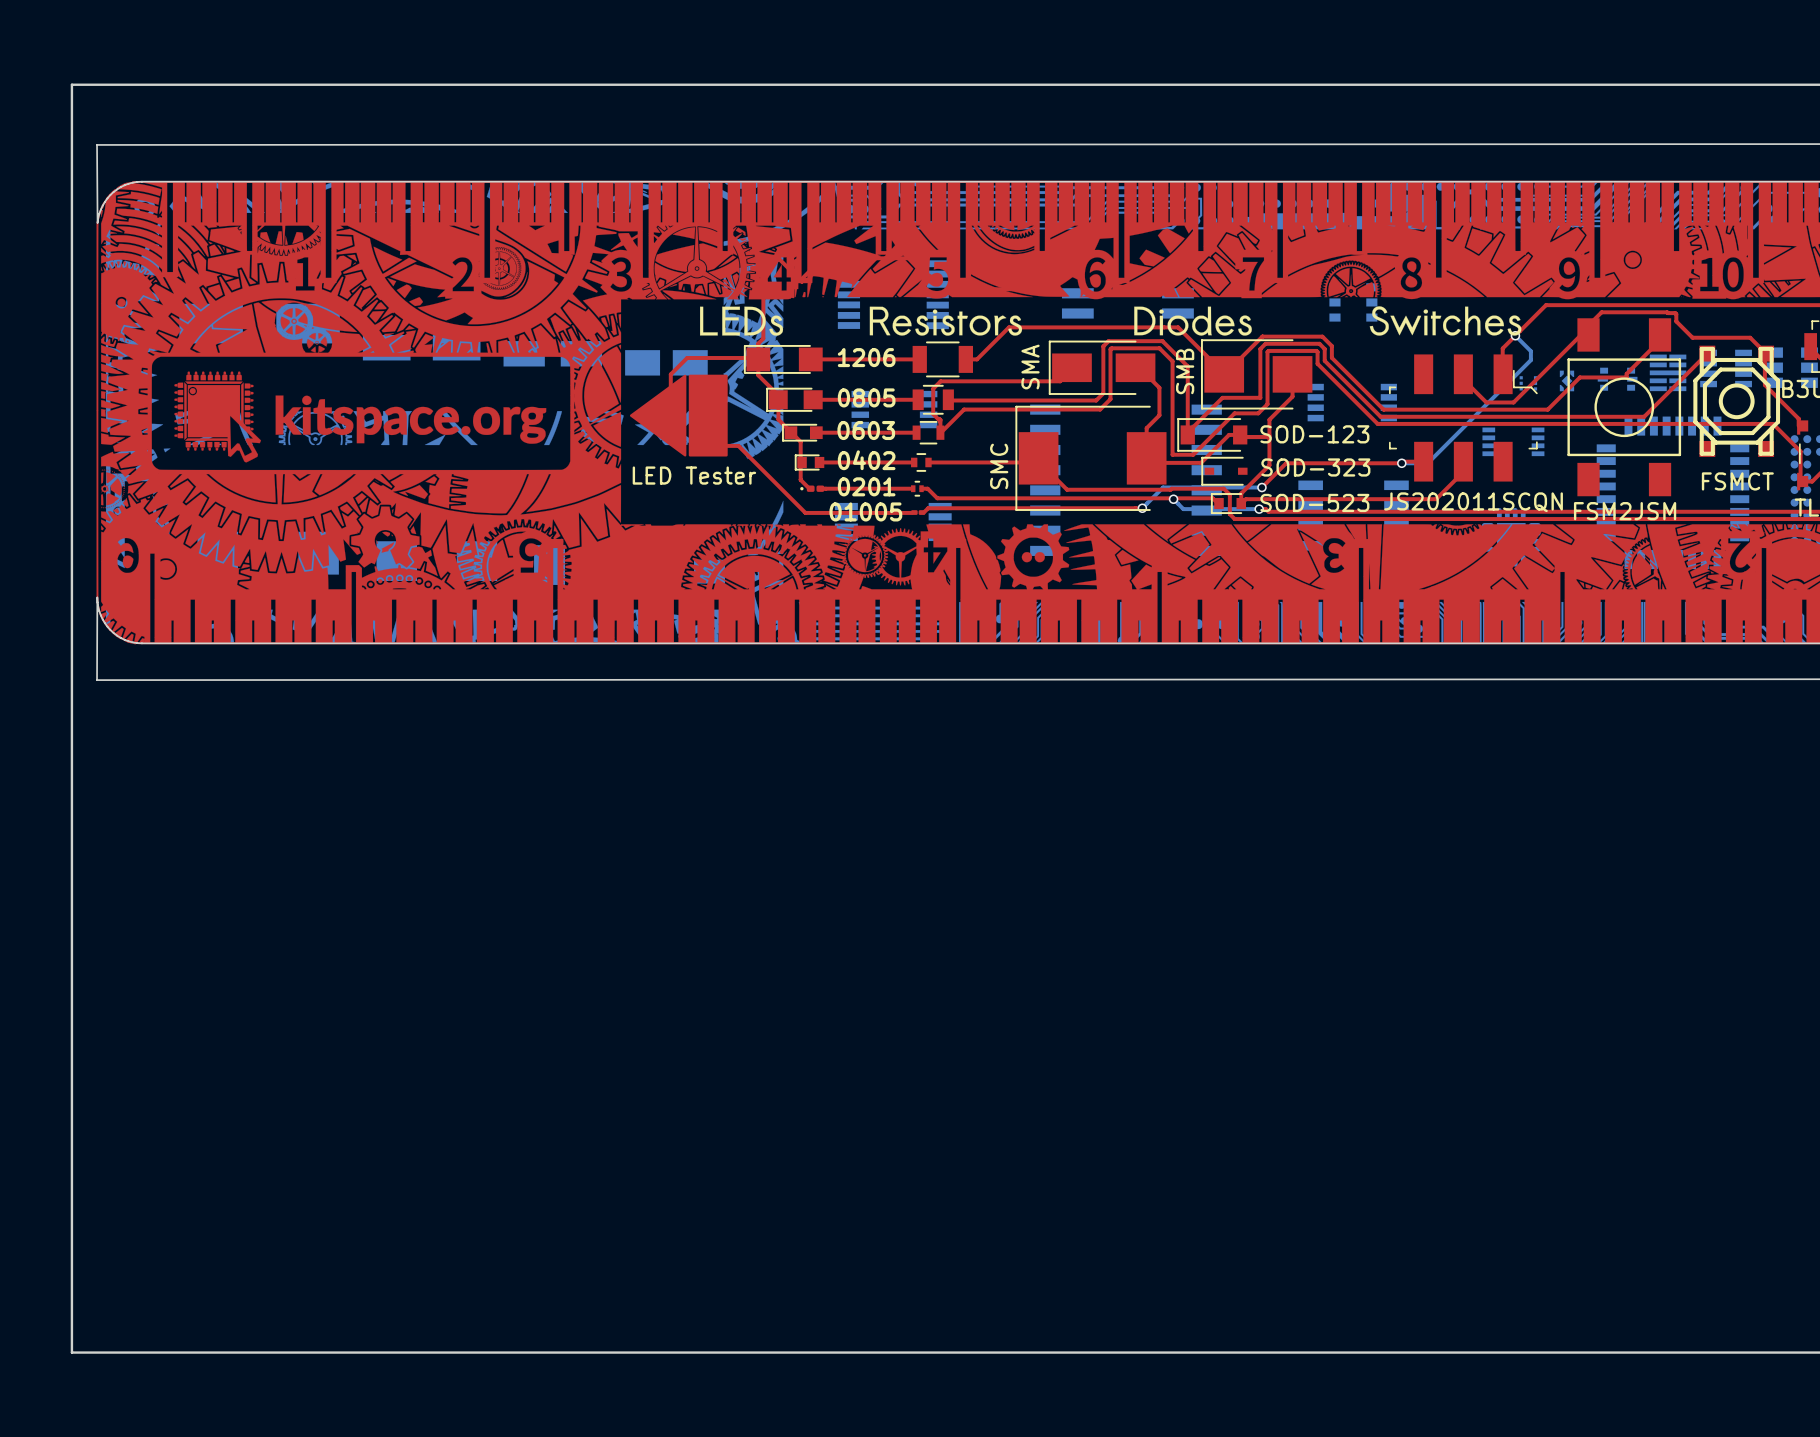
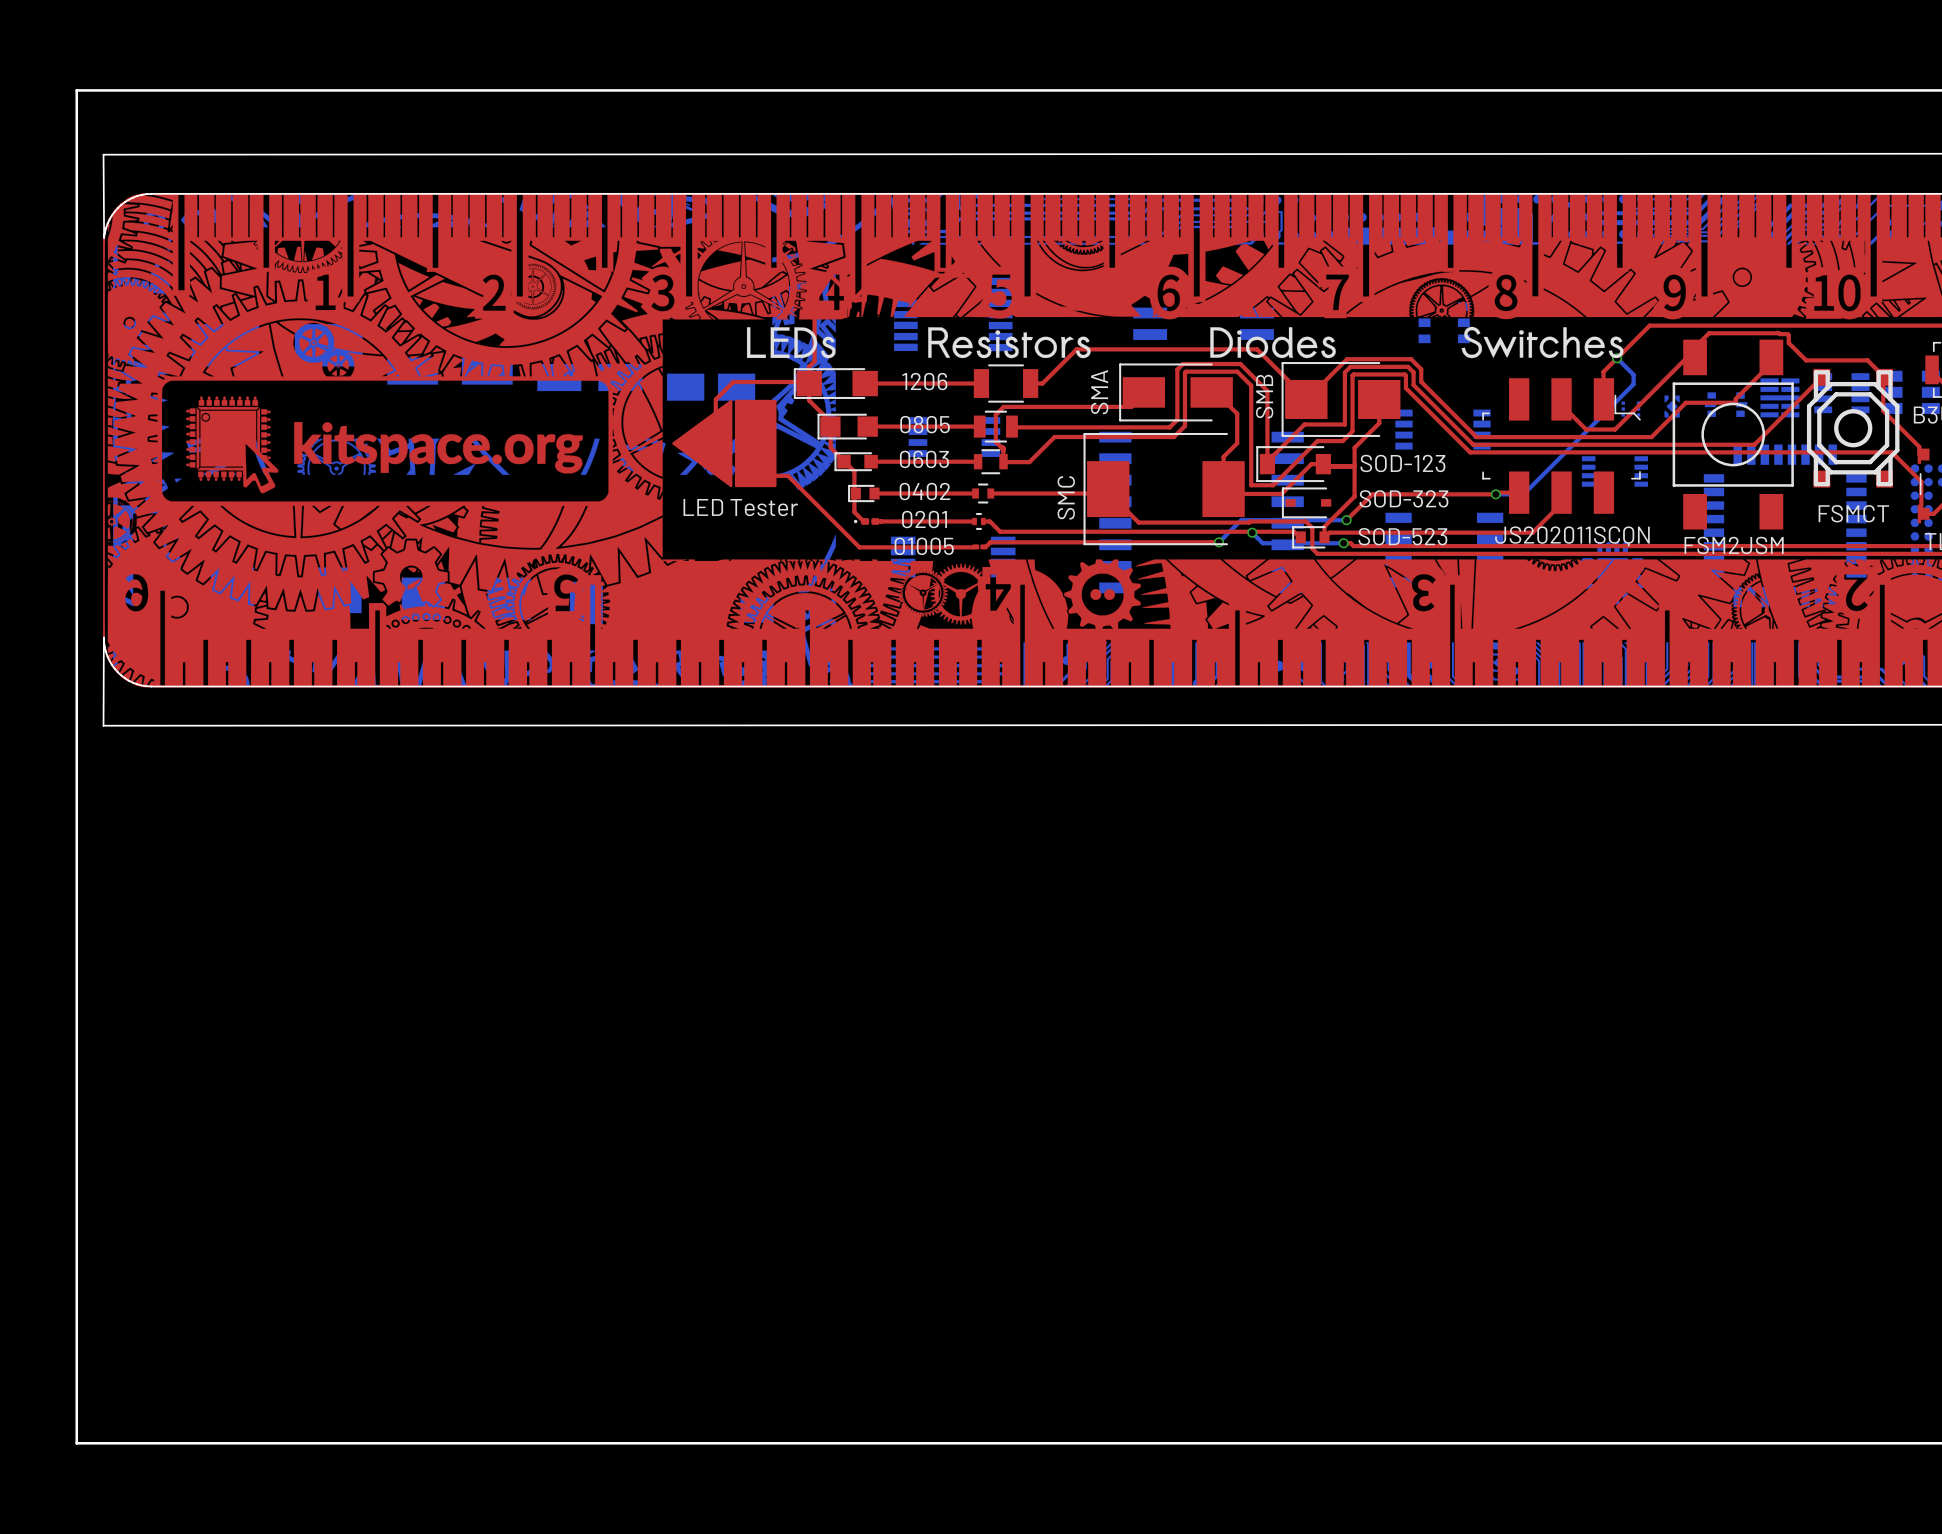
top track: (988, 409) (964, 409) (940, 433) -> (1054, 437) (1029, 462) (1003, 462)

